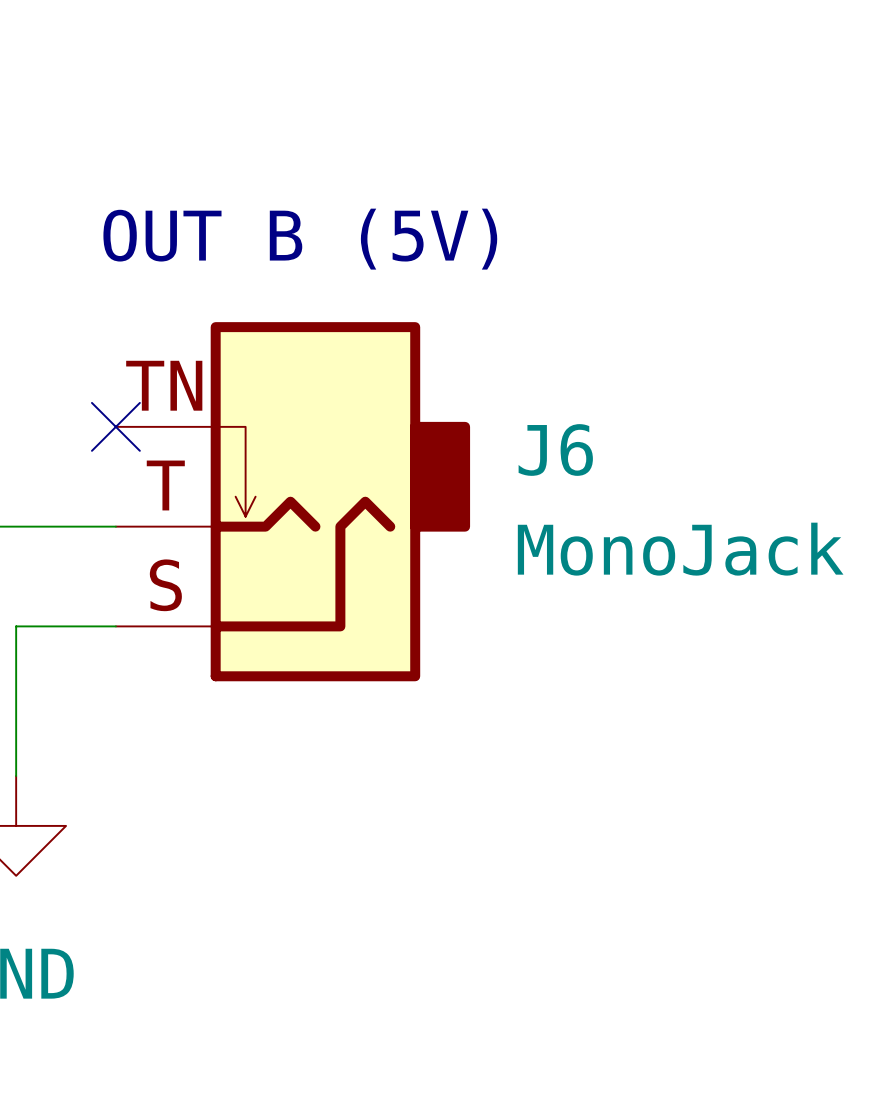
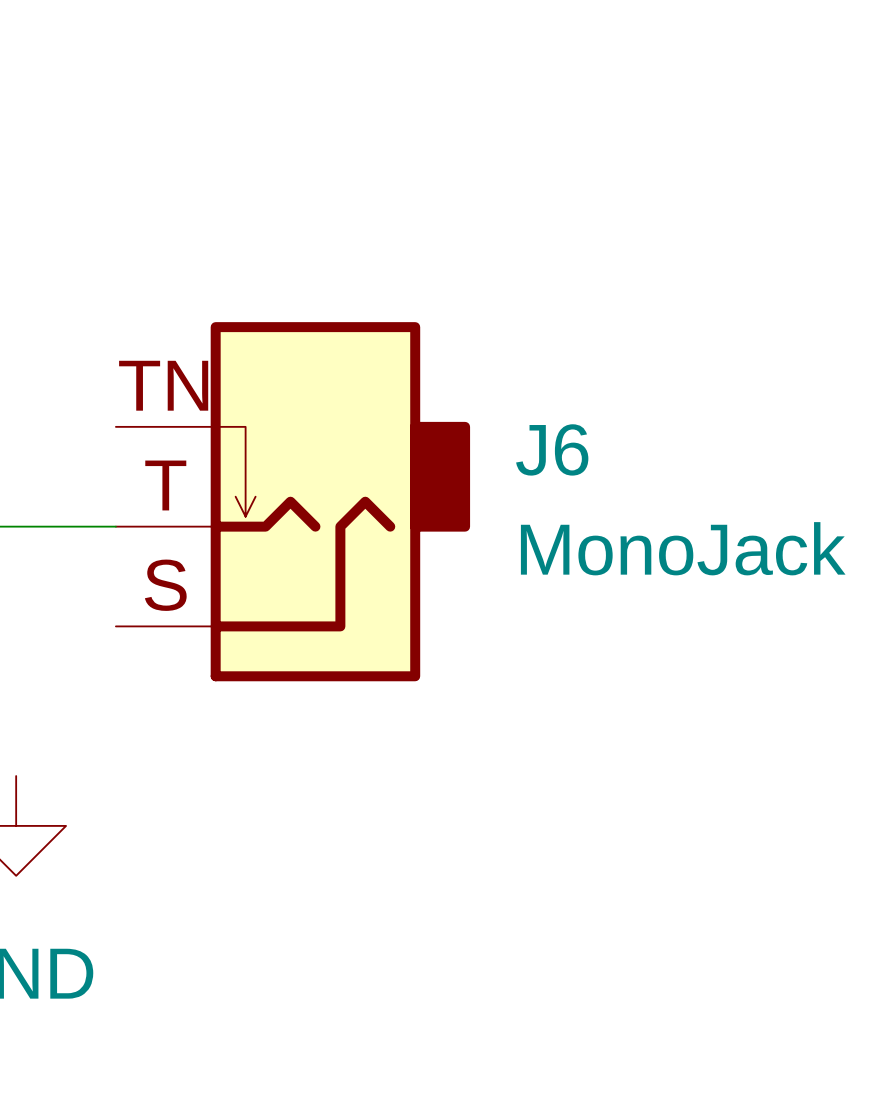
text: OUT B (5V) (300, 239) -> none
no-connect mark: (115, 426) -> none
wire: (115, 626) (16, 626) (16, 776) -> none

